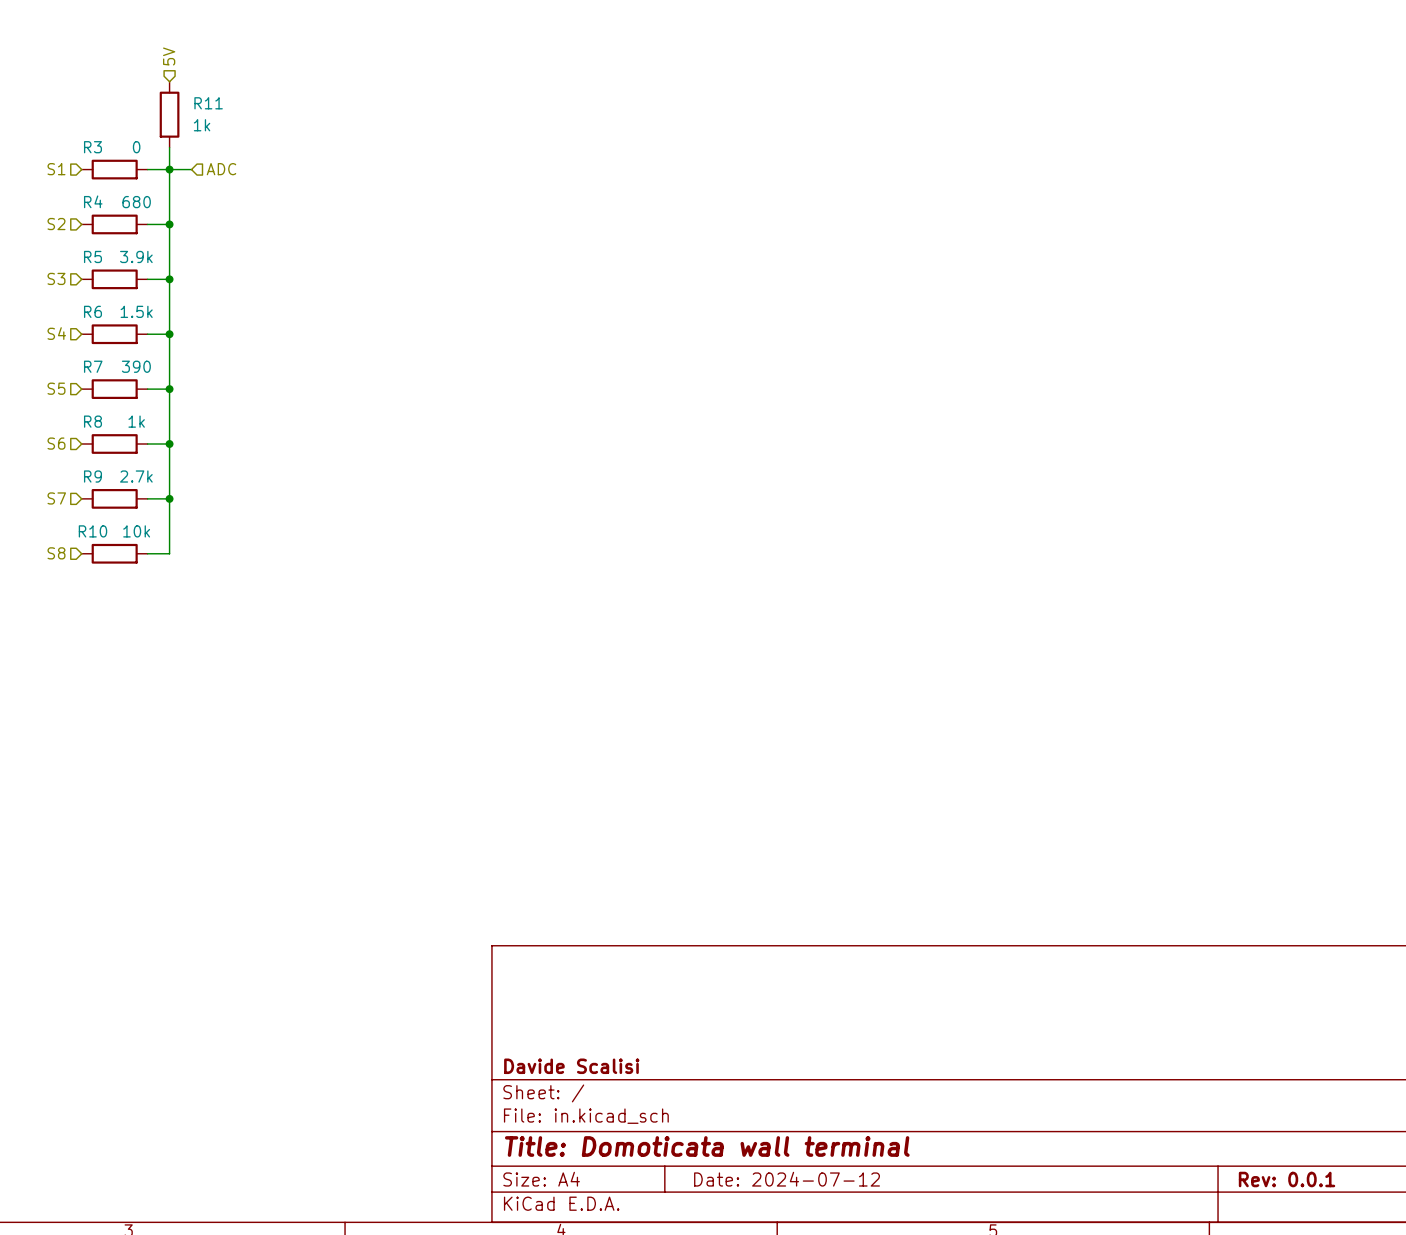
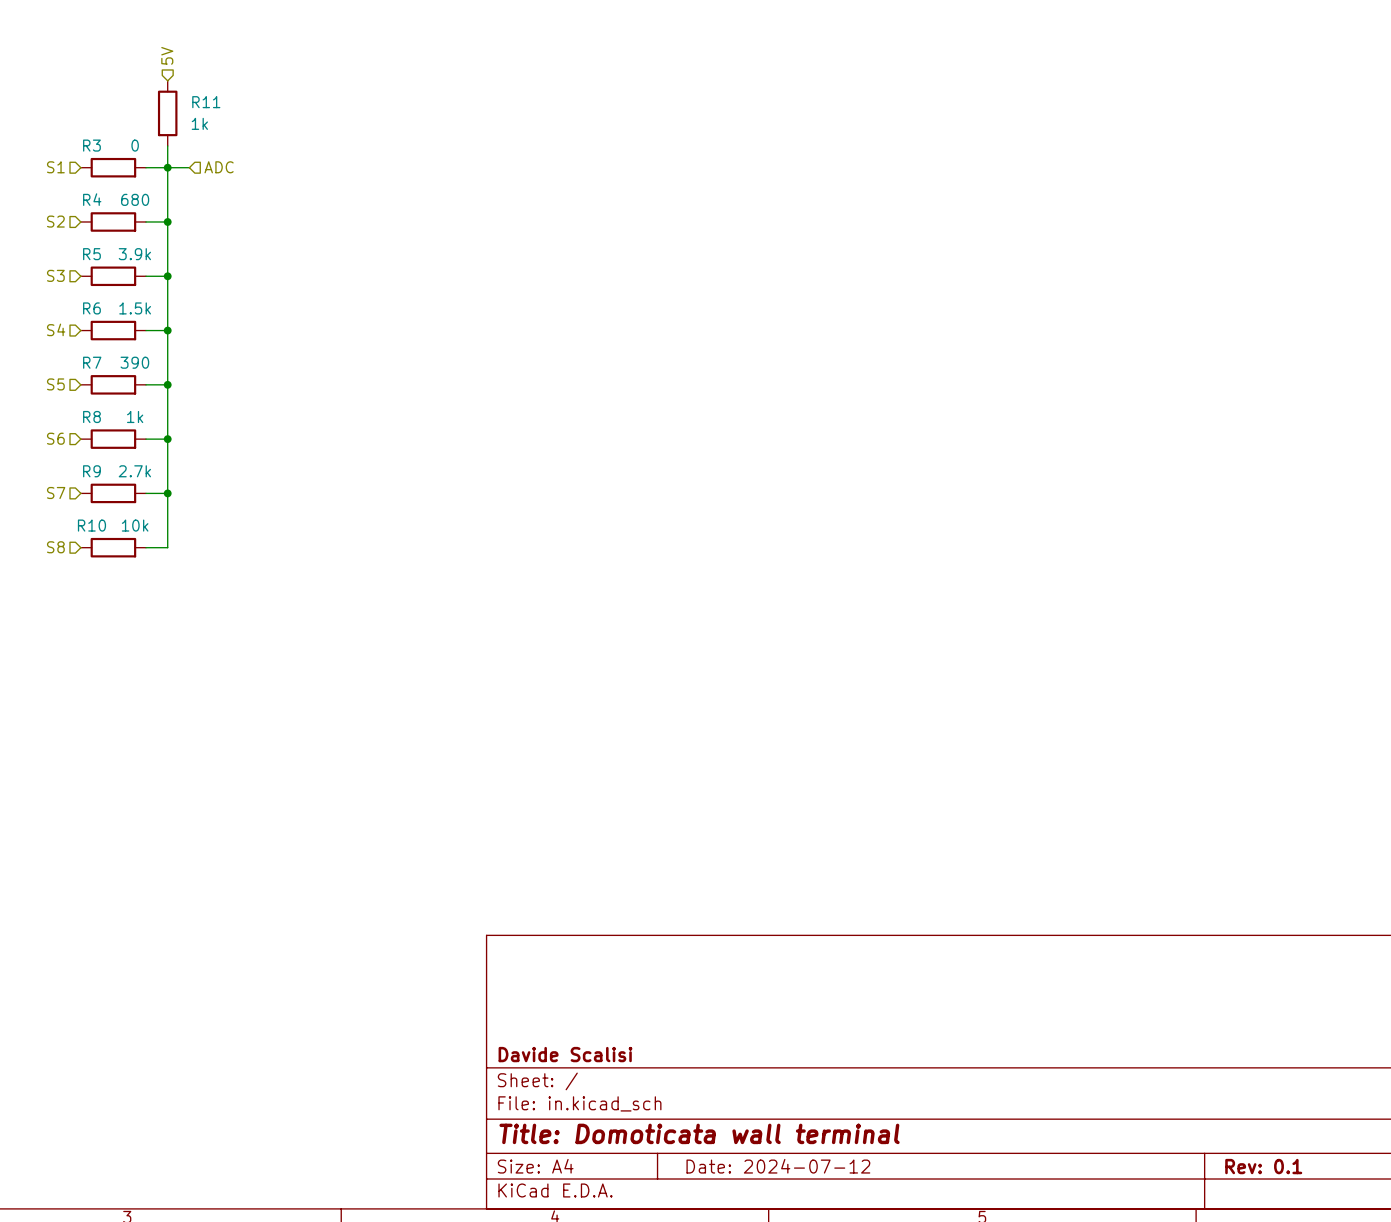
title block: Rev: 0.0.1 (1287, 1179) -> Rev: 0.1 (1263, 1166)

